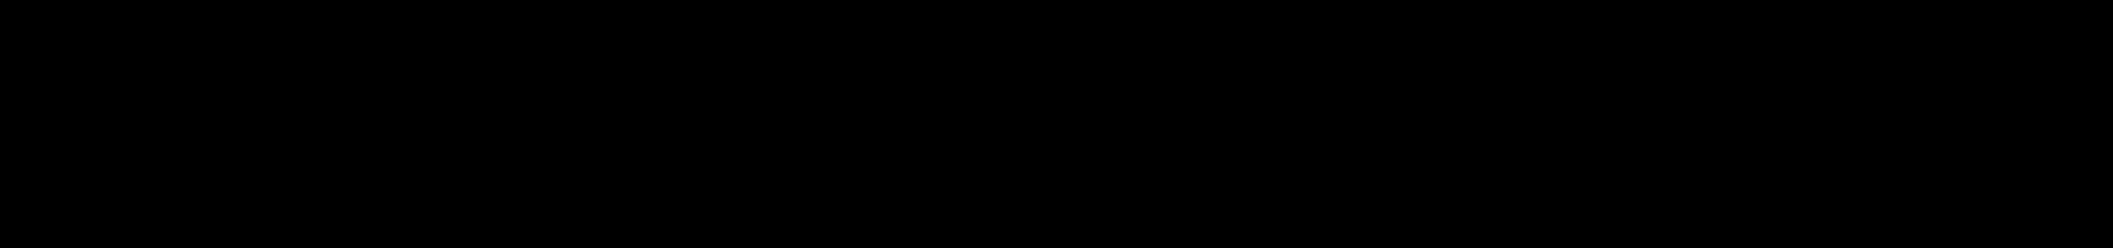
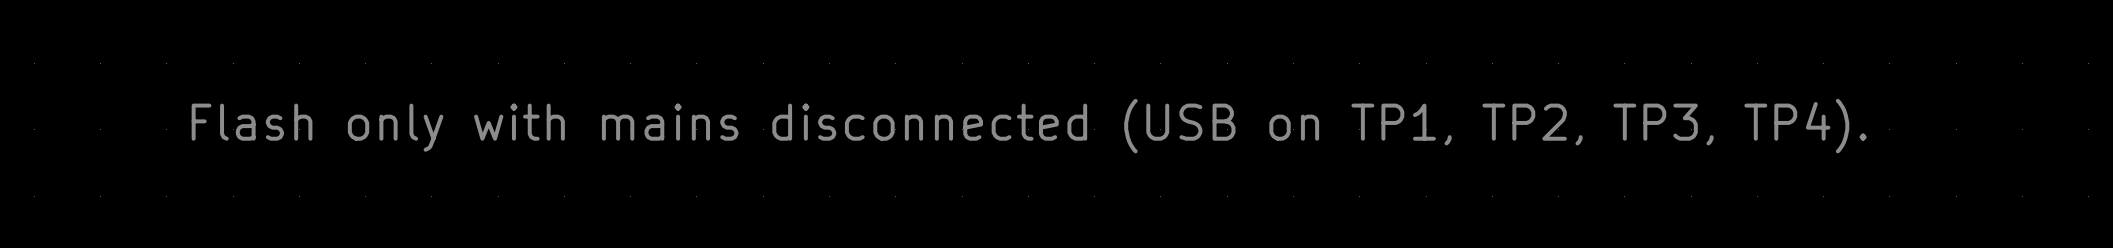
text: none -> Flash only with mains disconnected (USB on TP1, TP2, TP3, TP4). (1029, 126)

